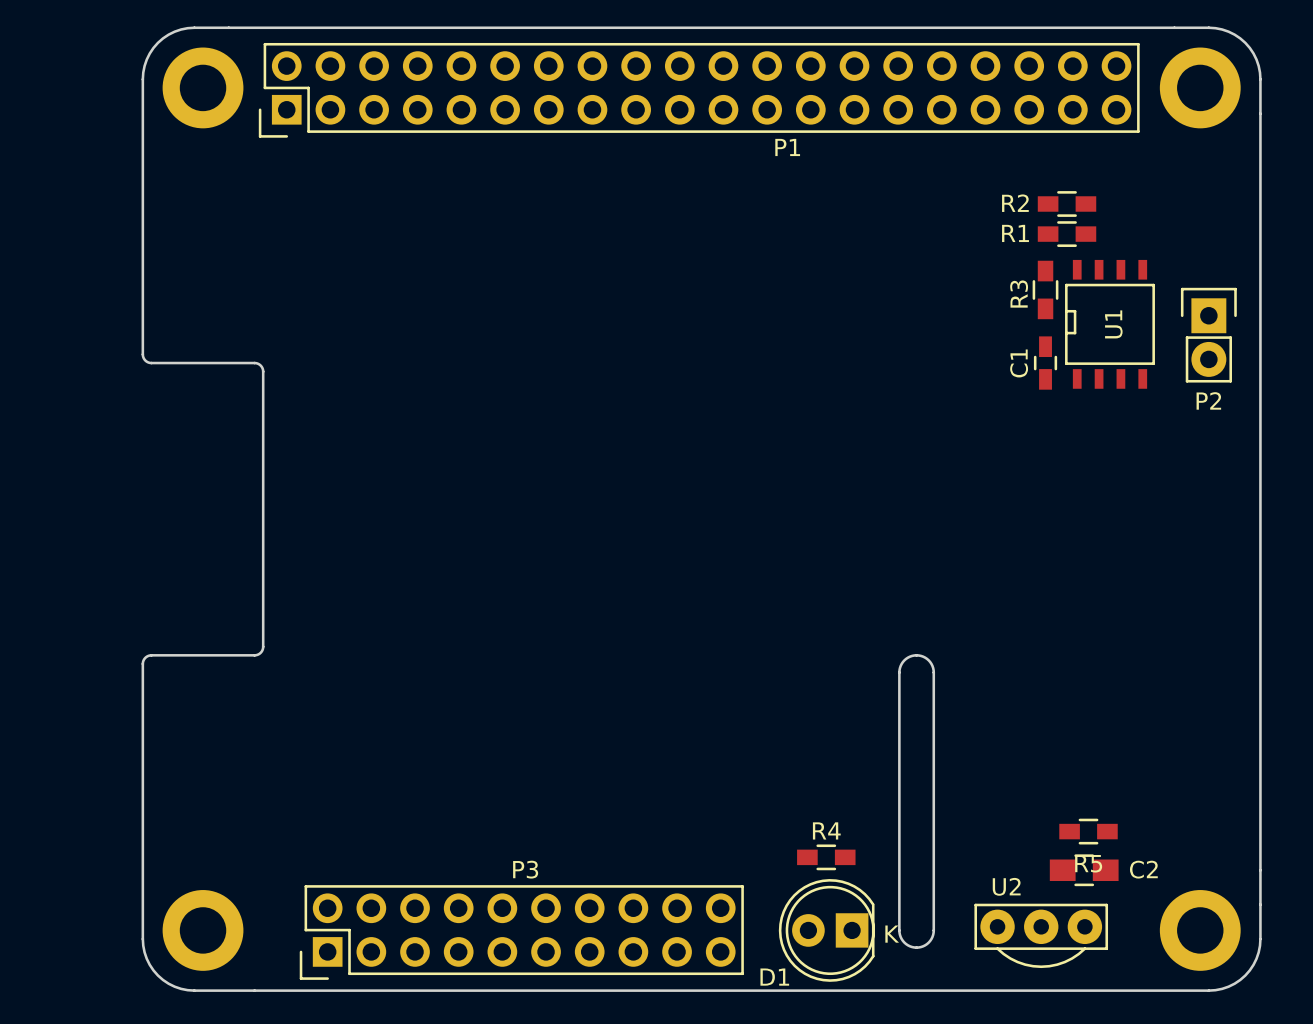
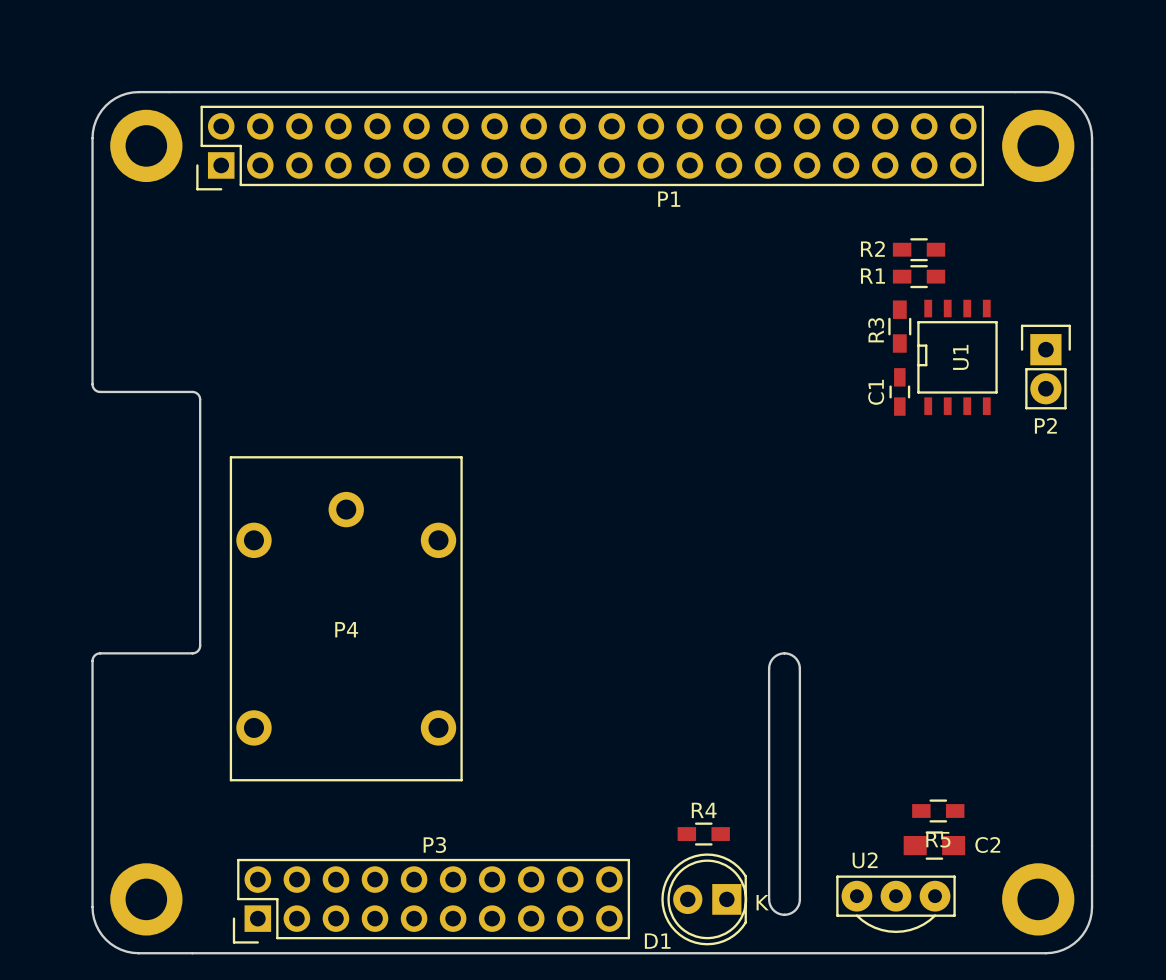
P4: none -> (346, 618)

